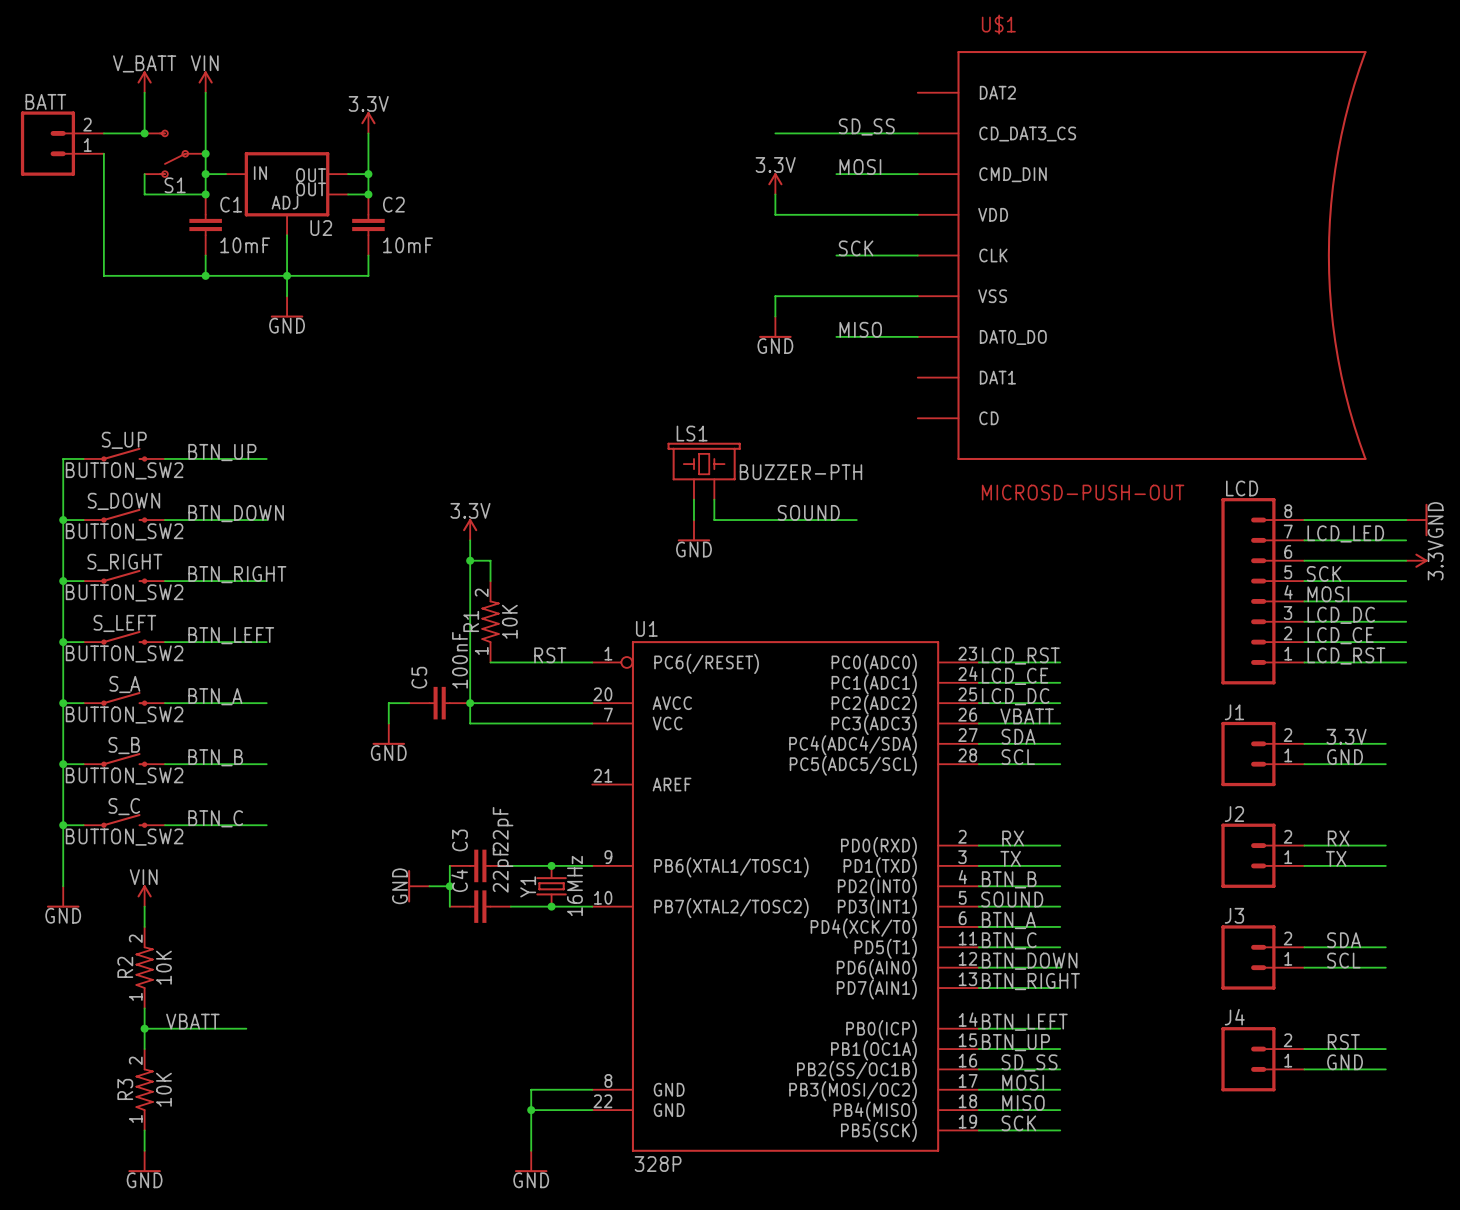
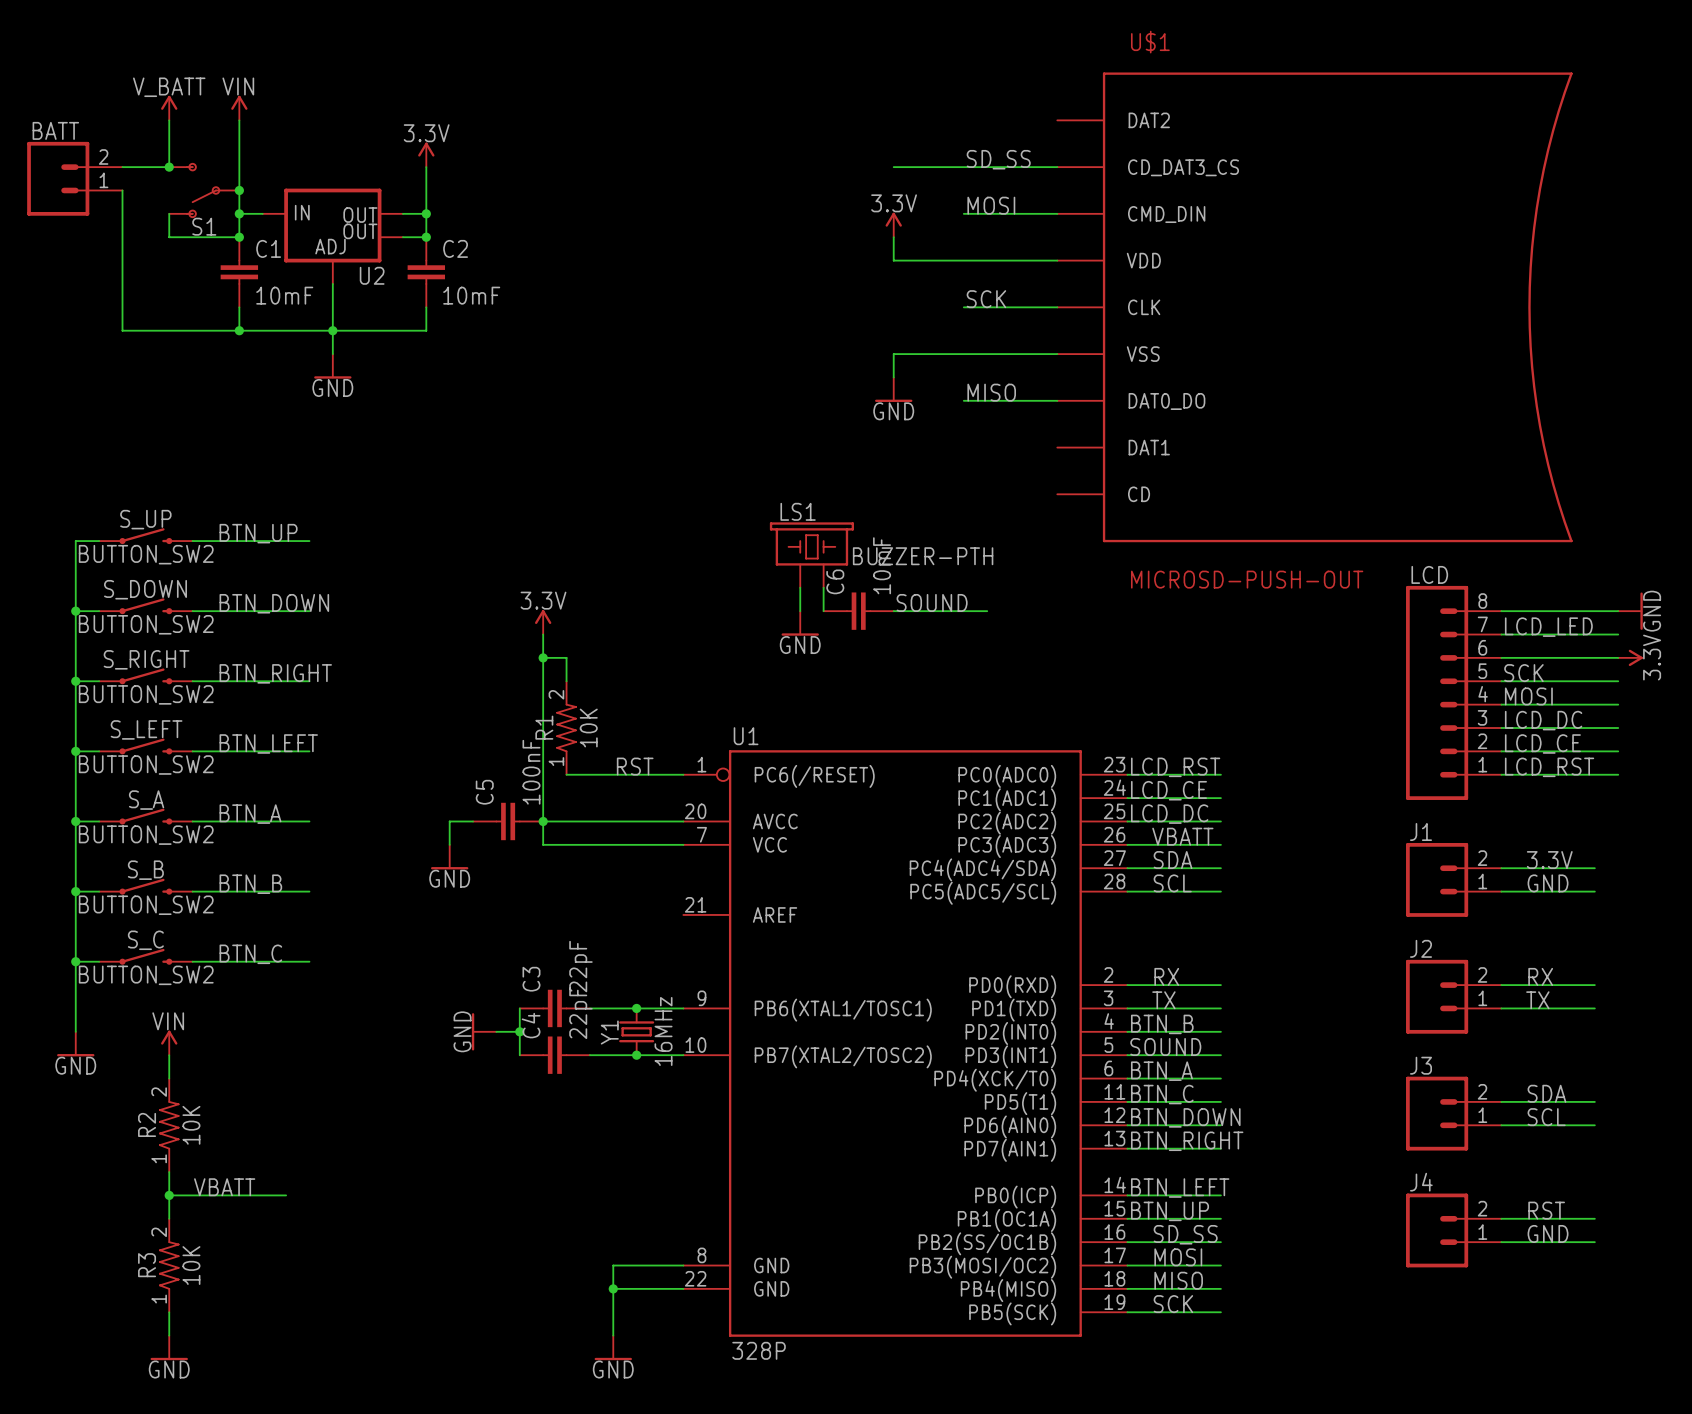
C6: none -> 10mF (858, 611)

